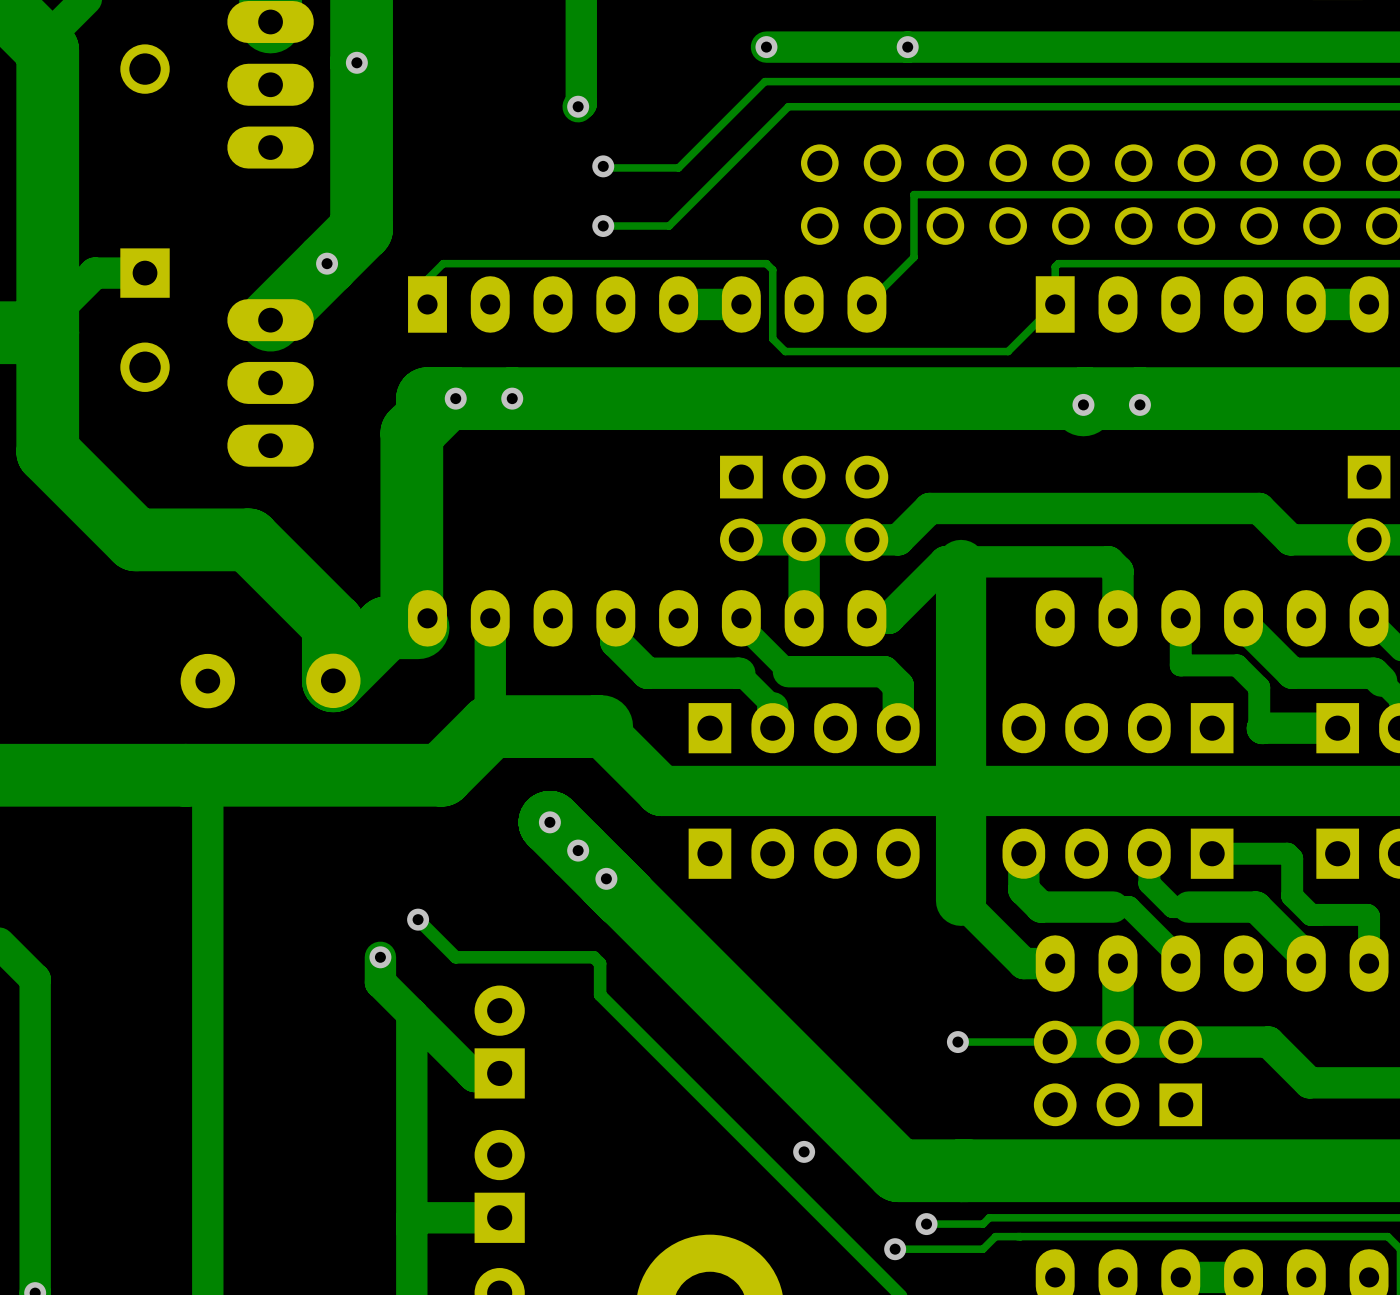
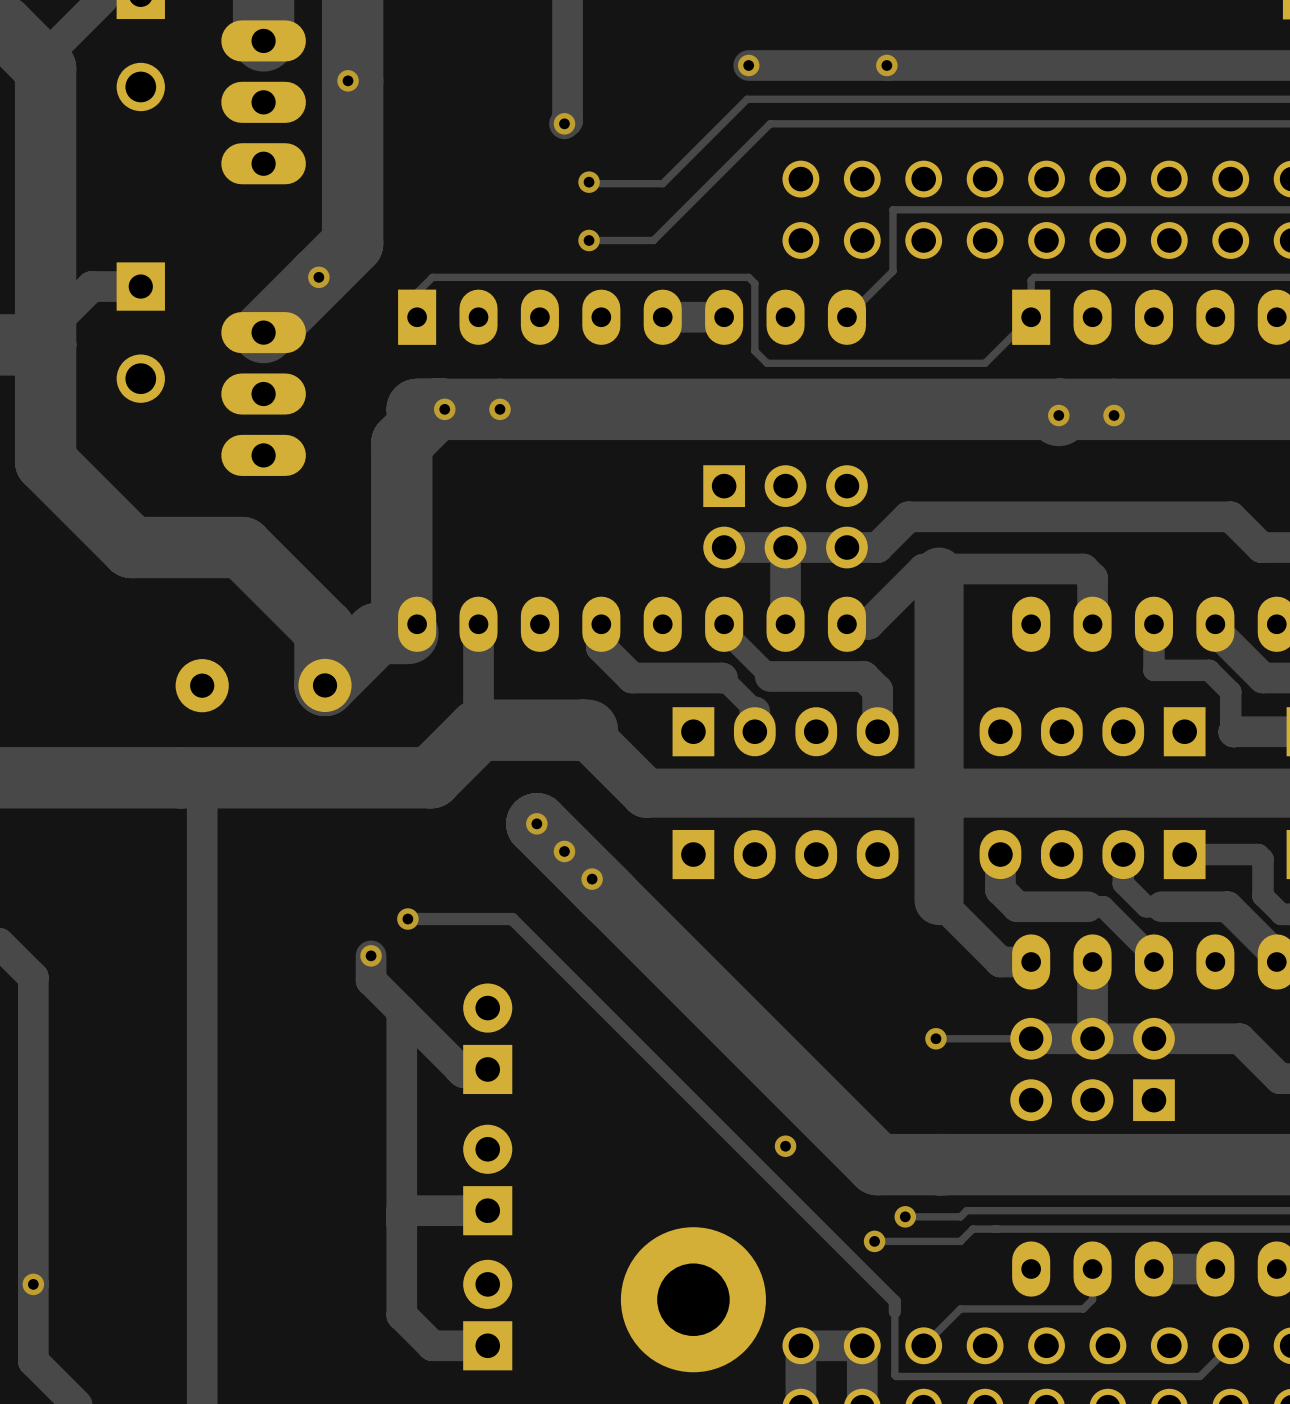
track: (418, 919) (455, 957) (593, 957) (600, 963) (600, 994) -> (407, 919) (512, 919) (585, 992)

